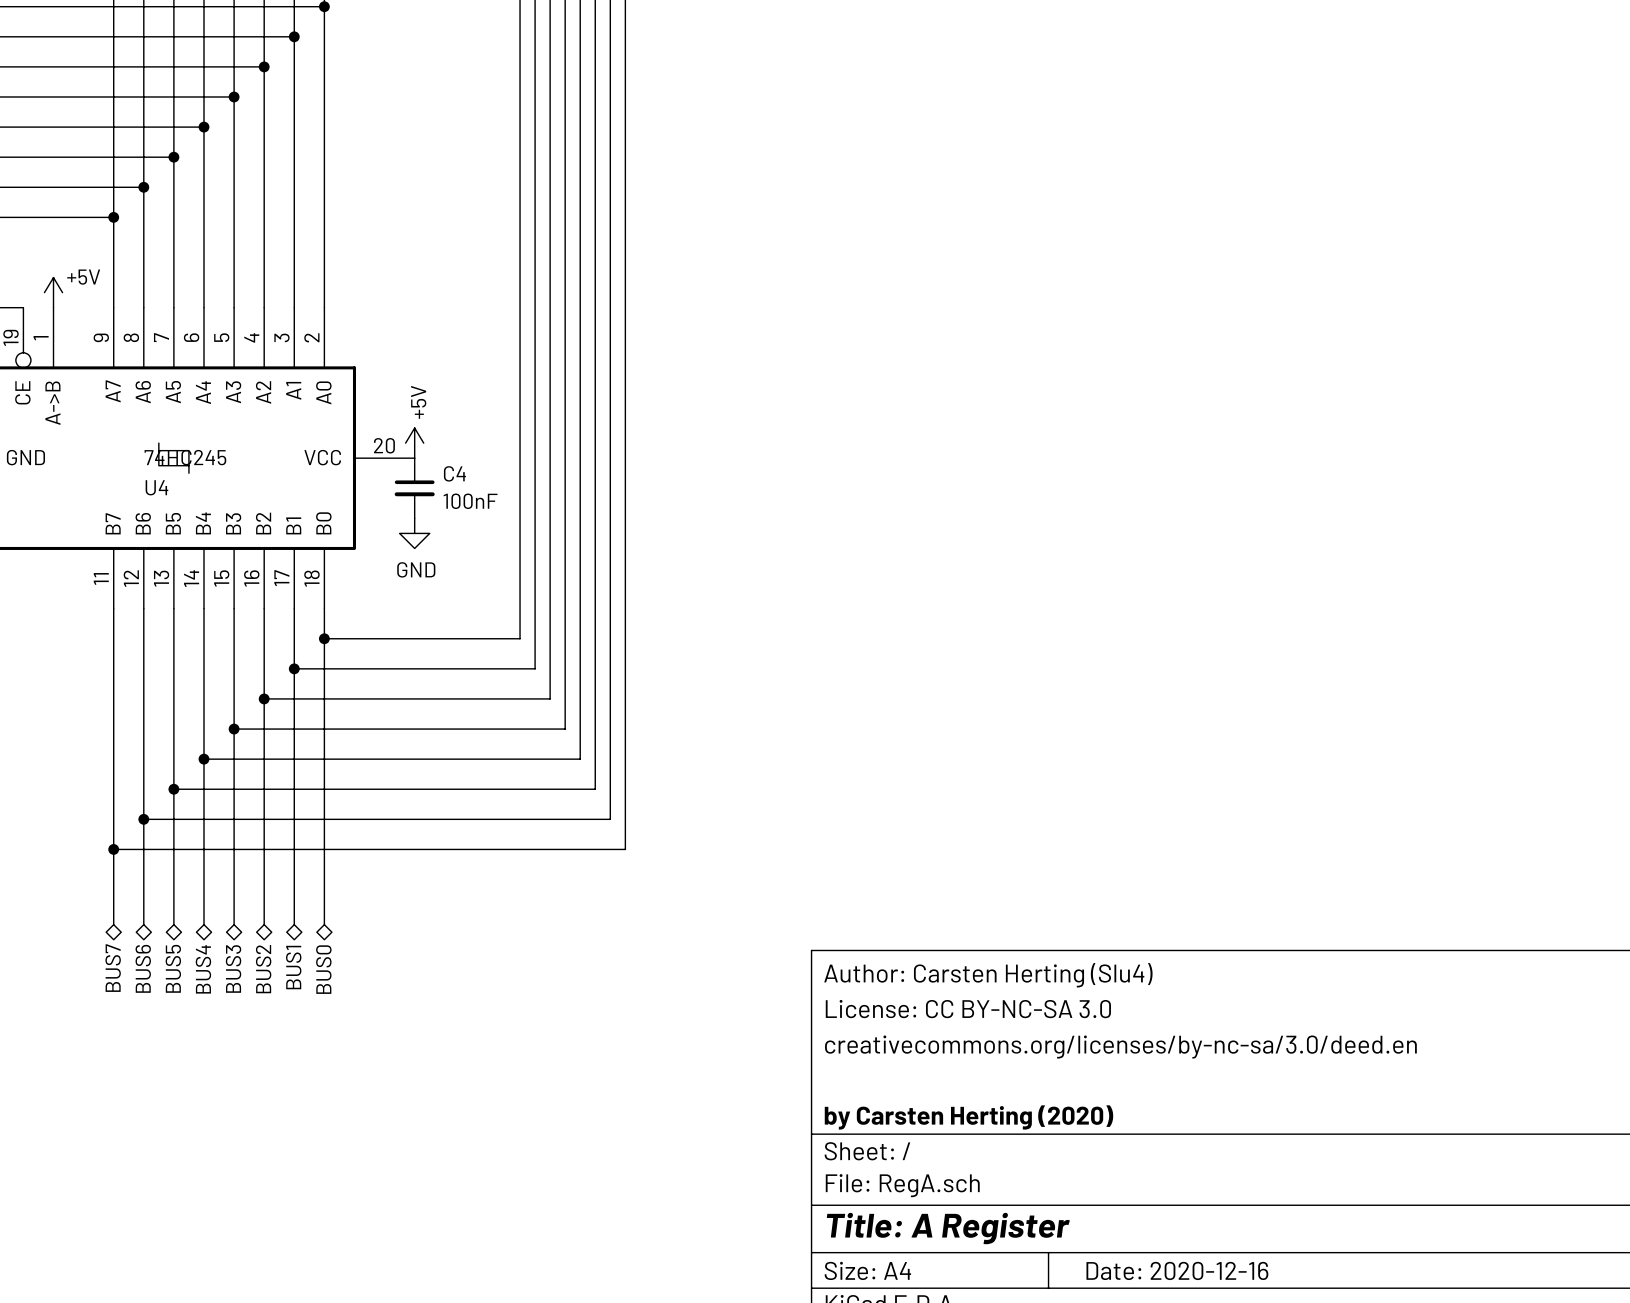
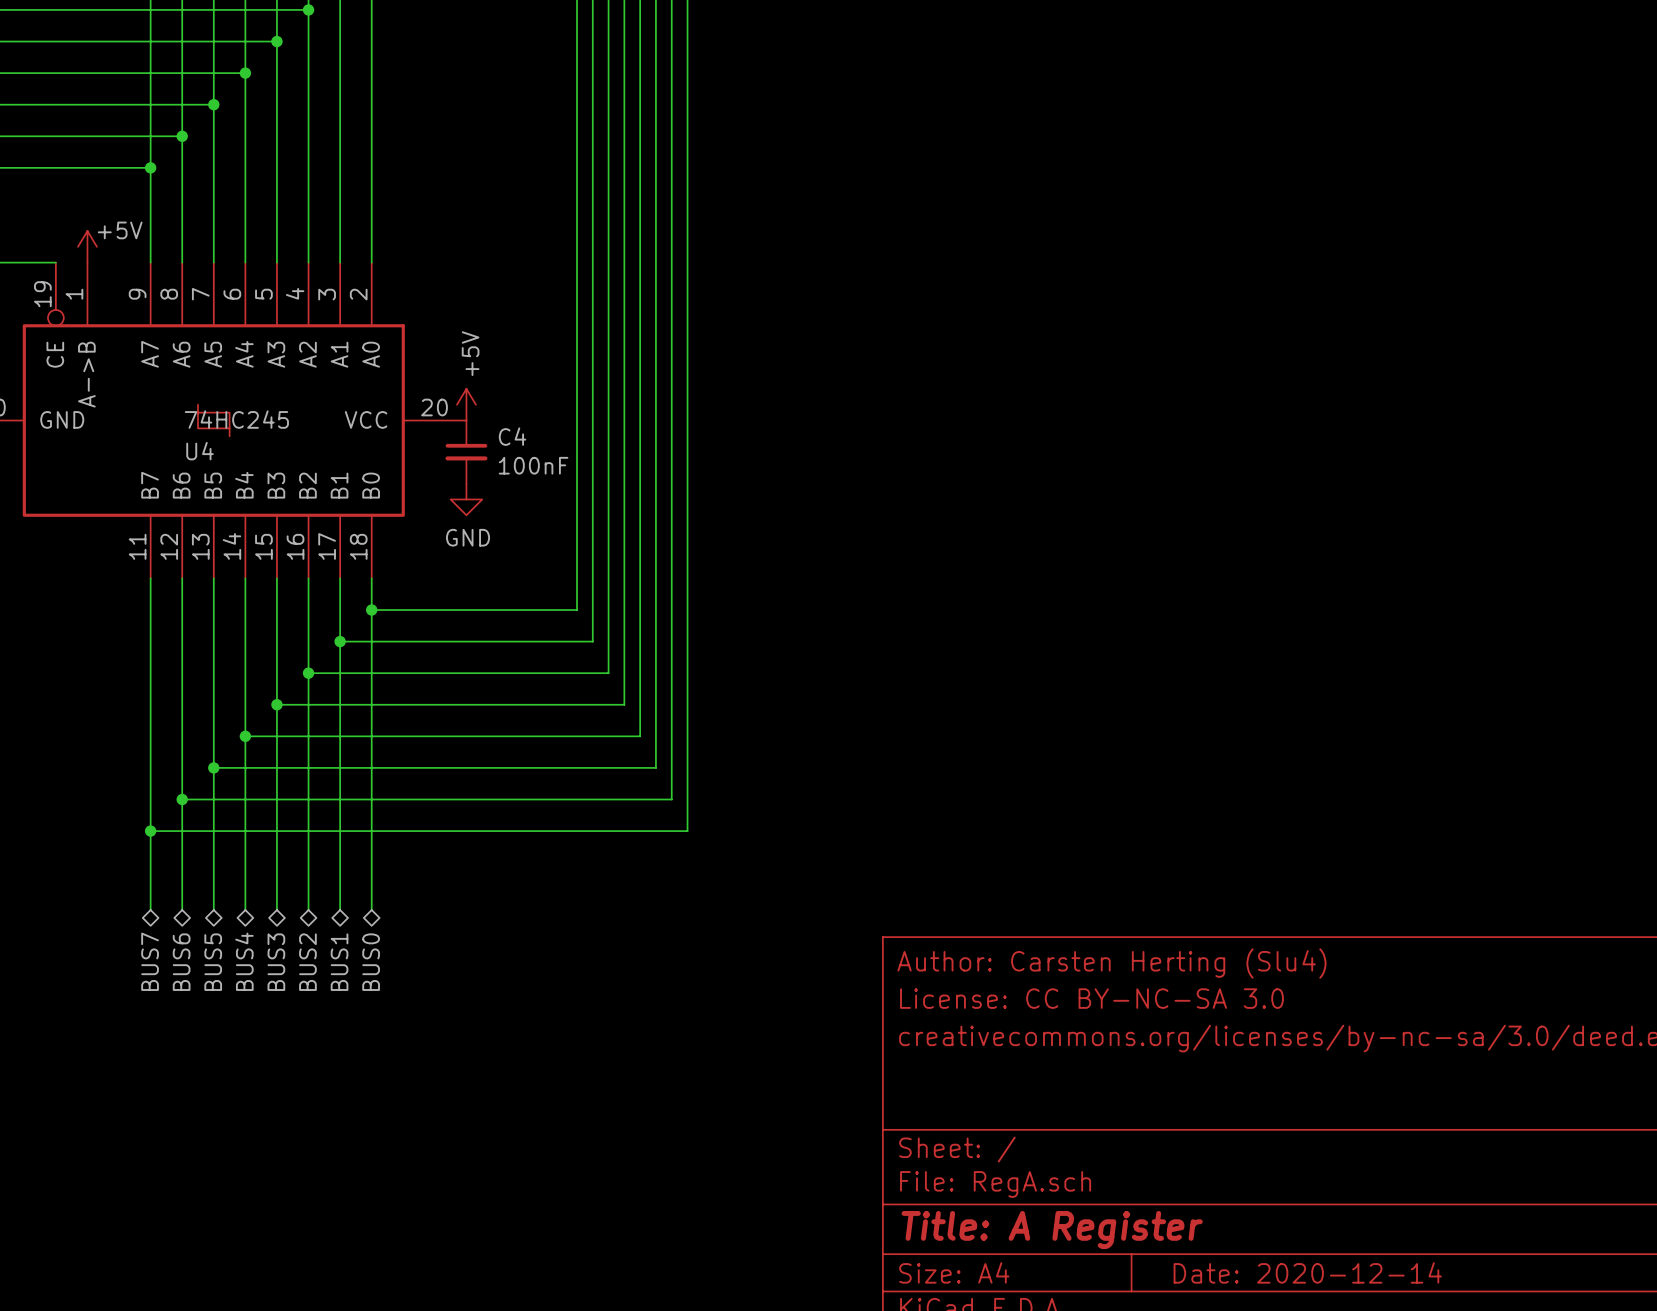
title block: by Carsten Herting (2020) (968, 1117) -> none
title block: Date: 2020-12-16 (1177, 1270) -> Date: 2020-12-14 (1307, 1272)

